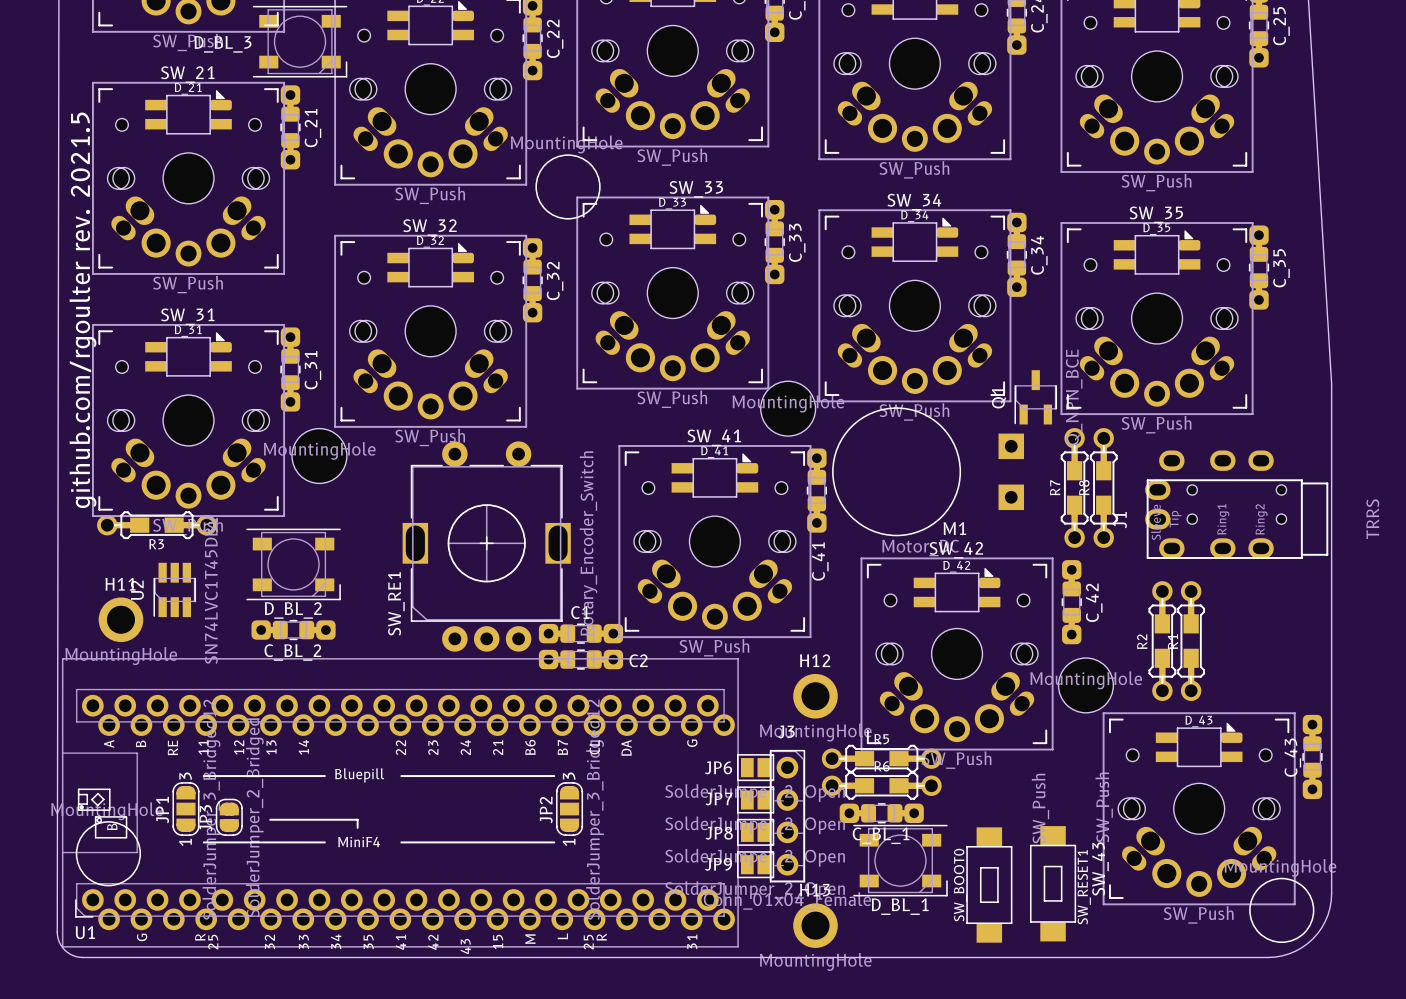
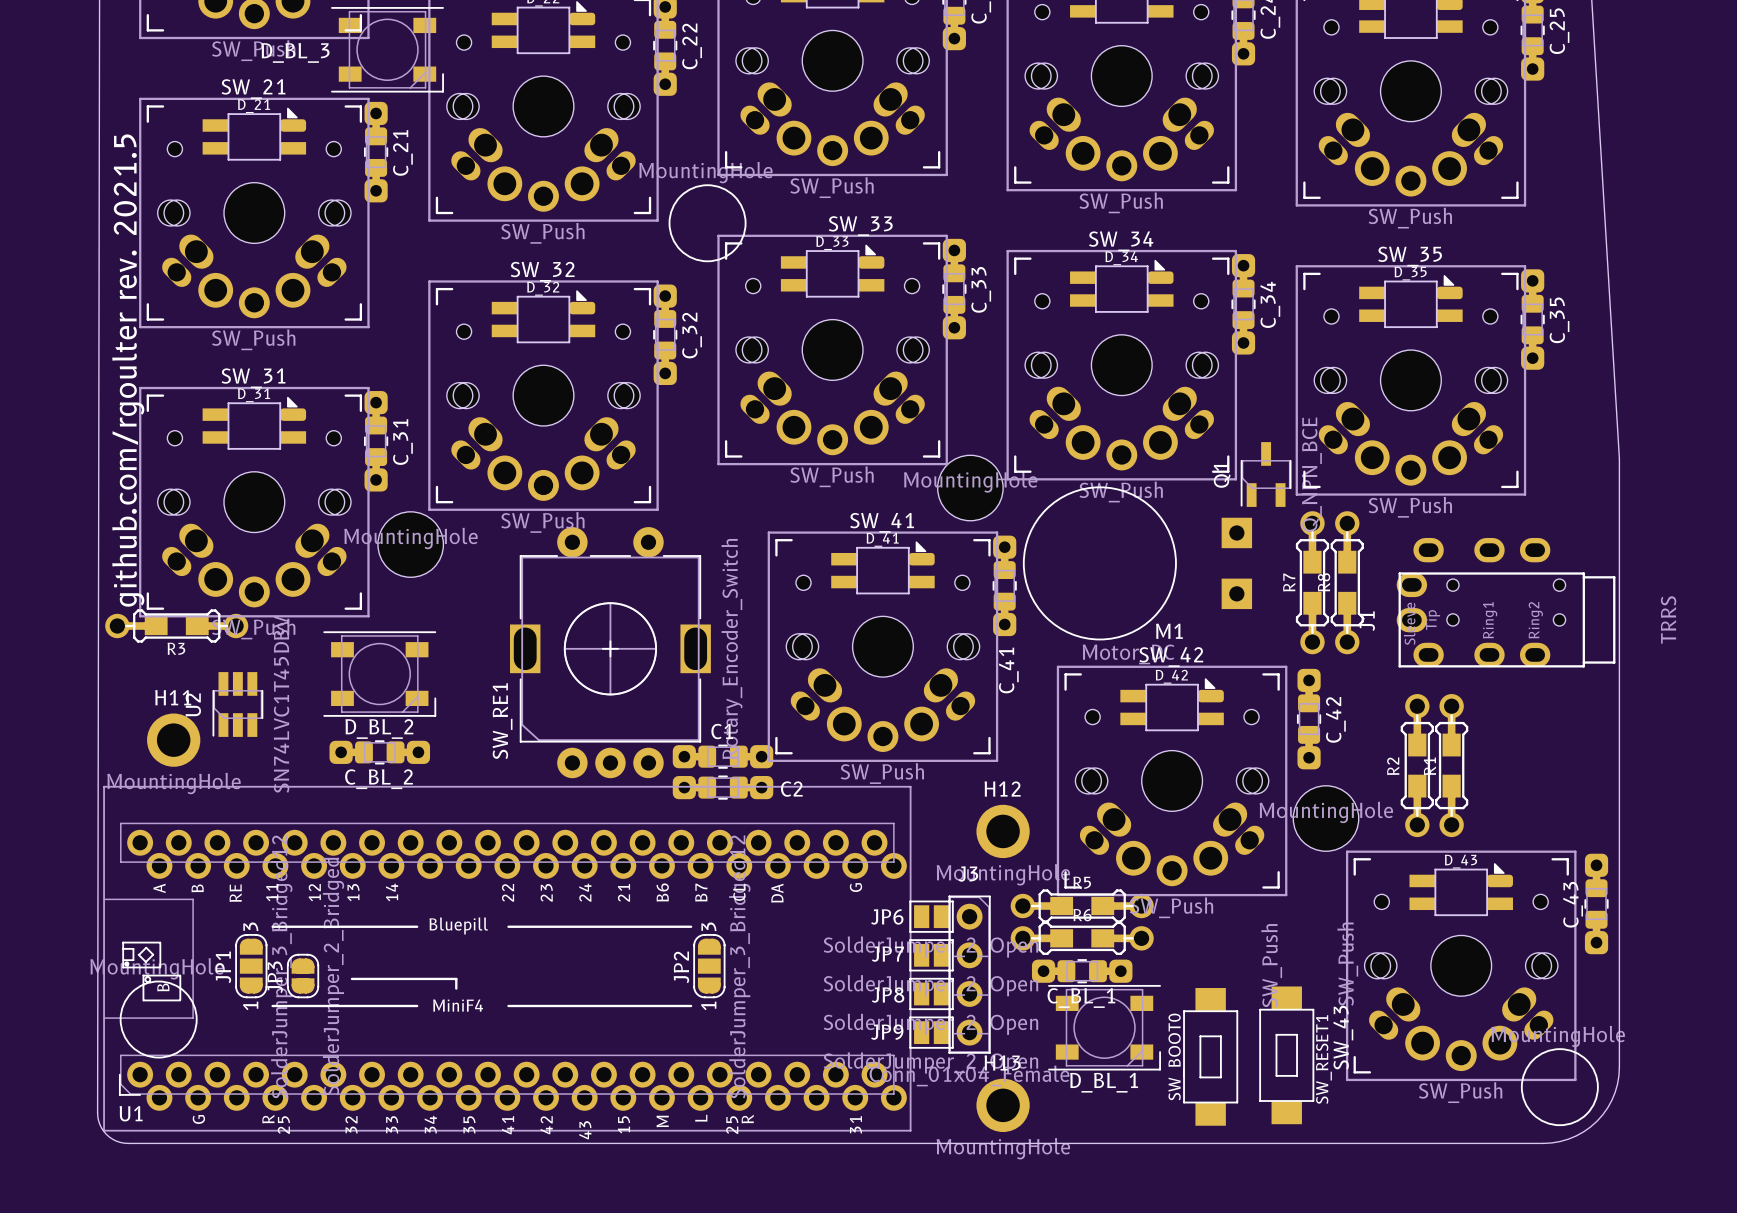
R3 position: (156, 525) -> (176, 626)

